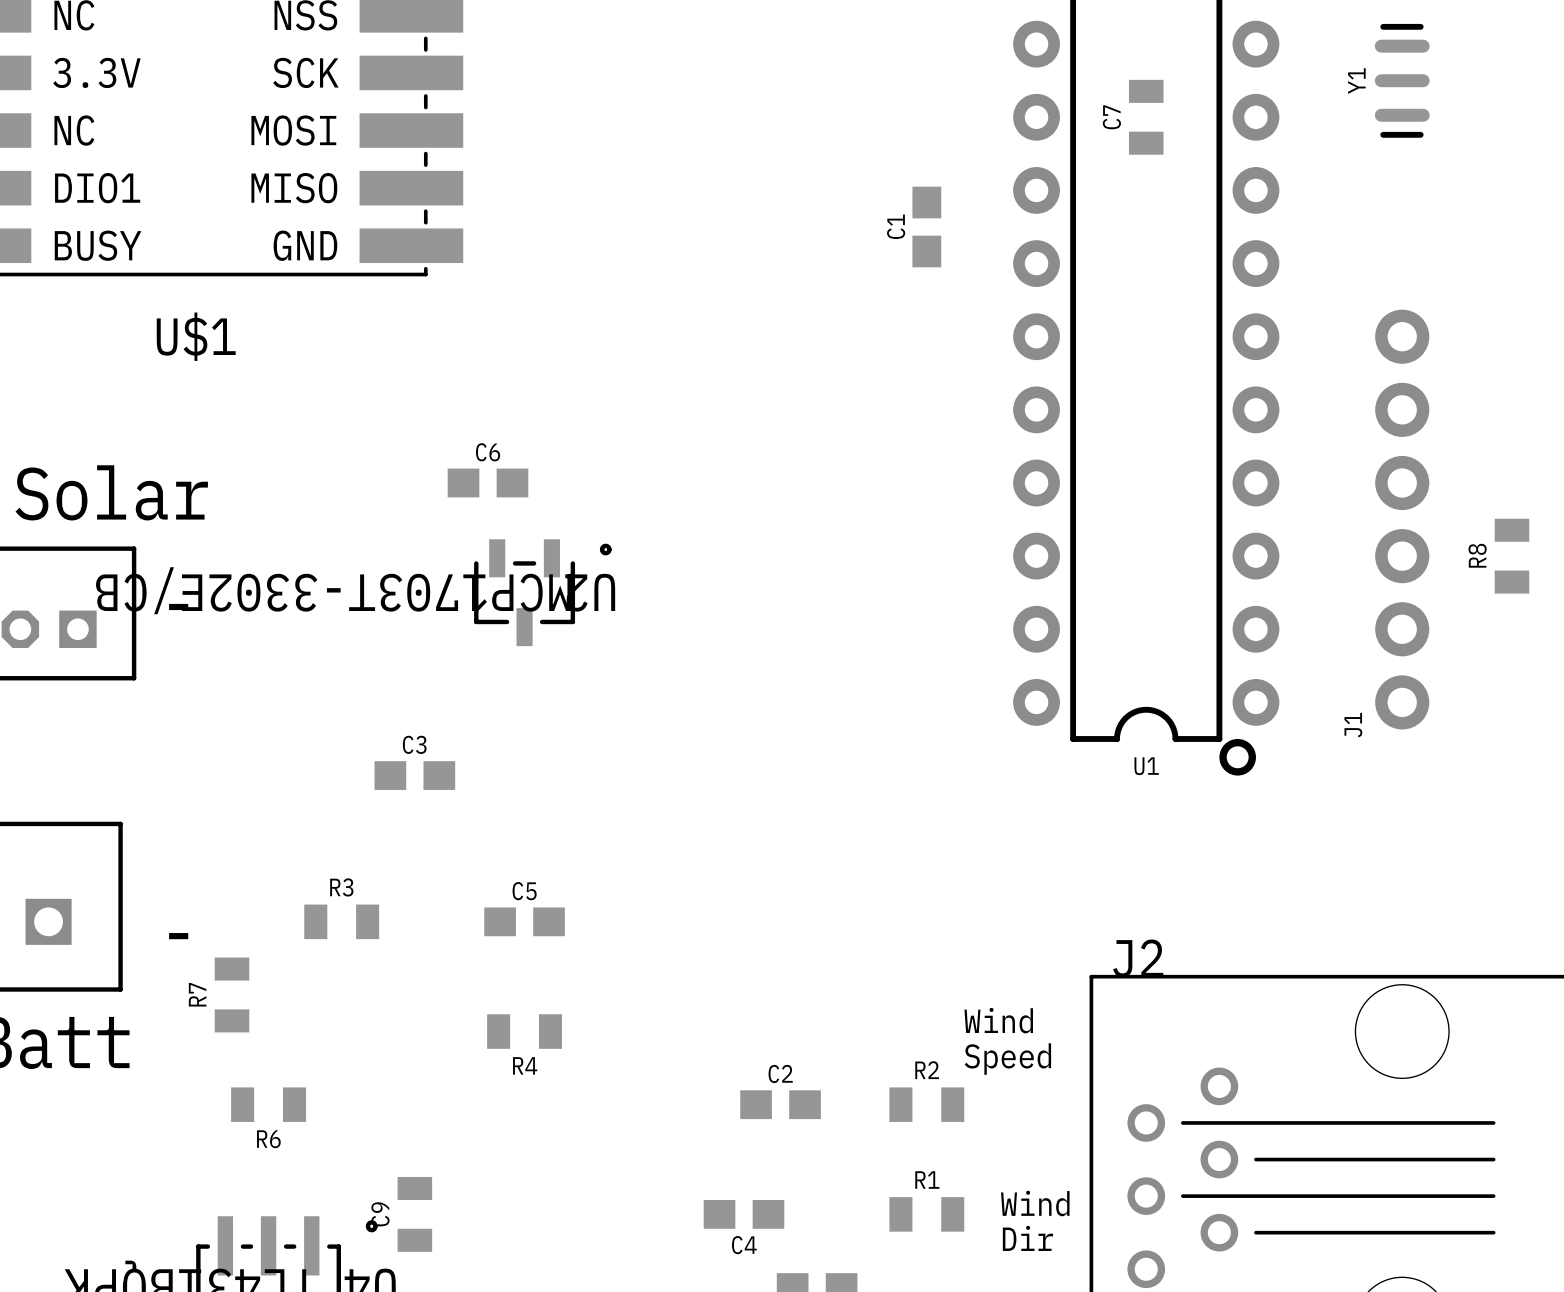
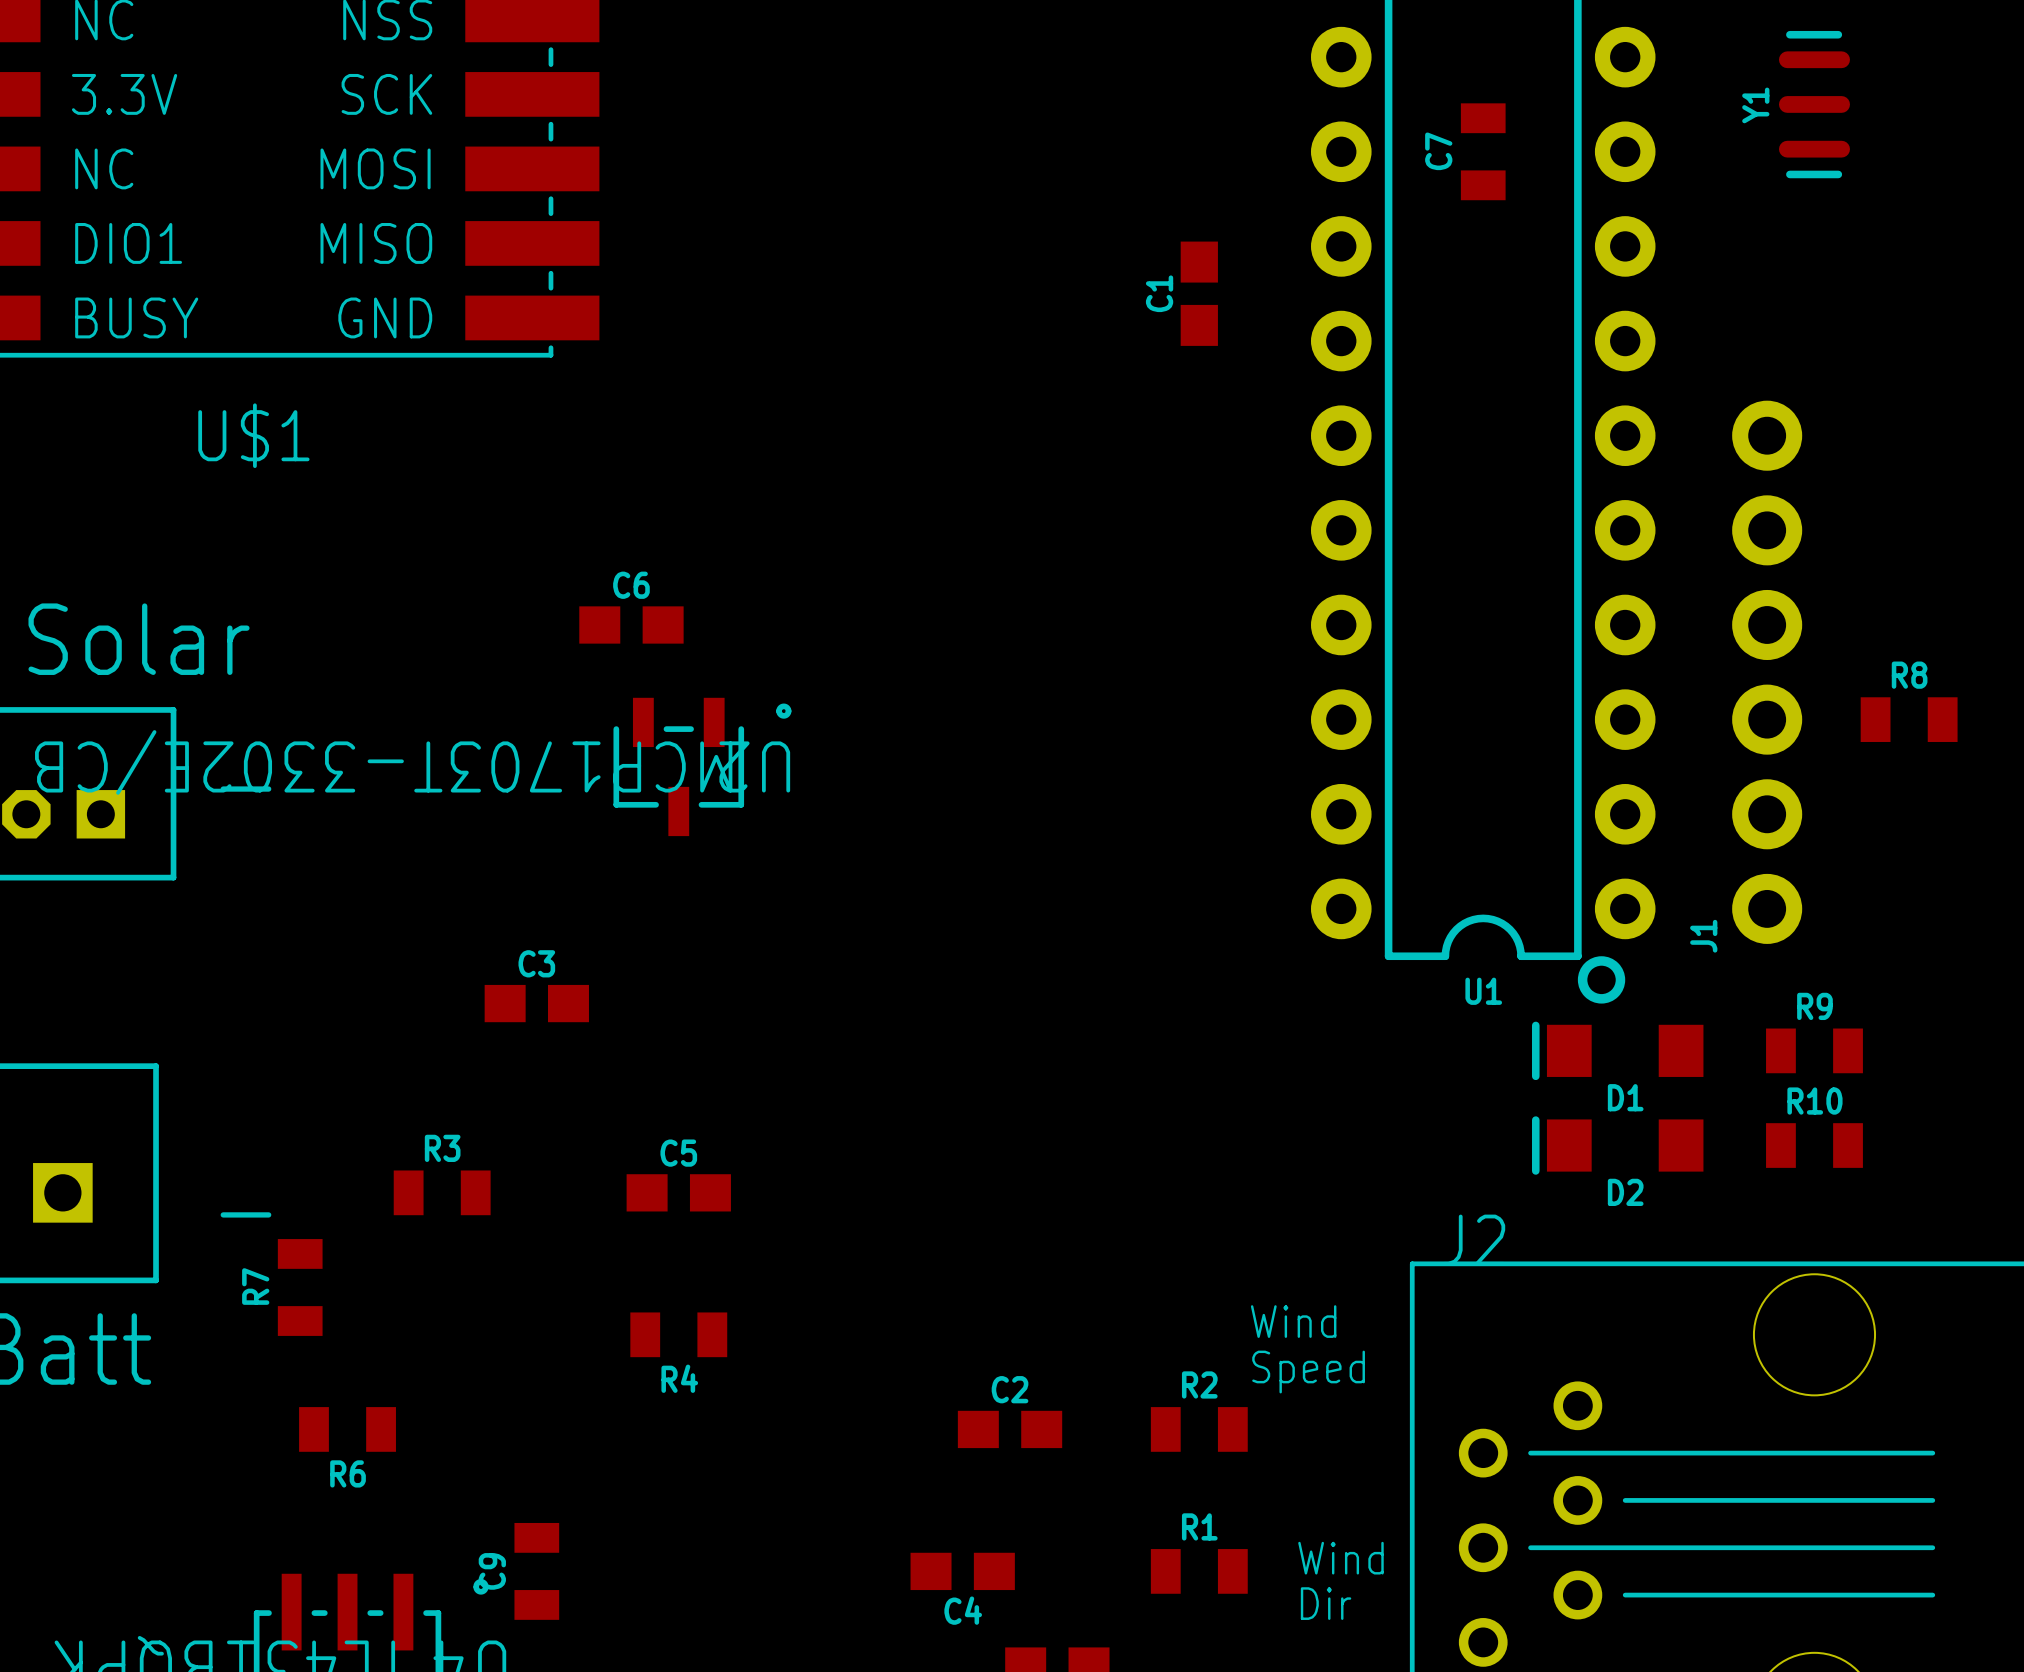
J1 position: (1402, 519) -> (1767, 672)
R8 rotation: 0° (1511, 556) -> 90° clockwise (1909, 719)
D1: none -> (1617, 1050)
R9: none -> (1814, 1050)
D2: none -> (1617, 1145)
R10: none -> (1814, 1145)

